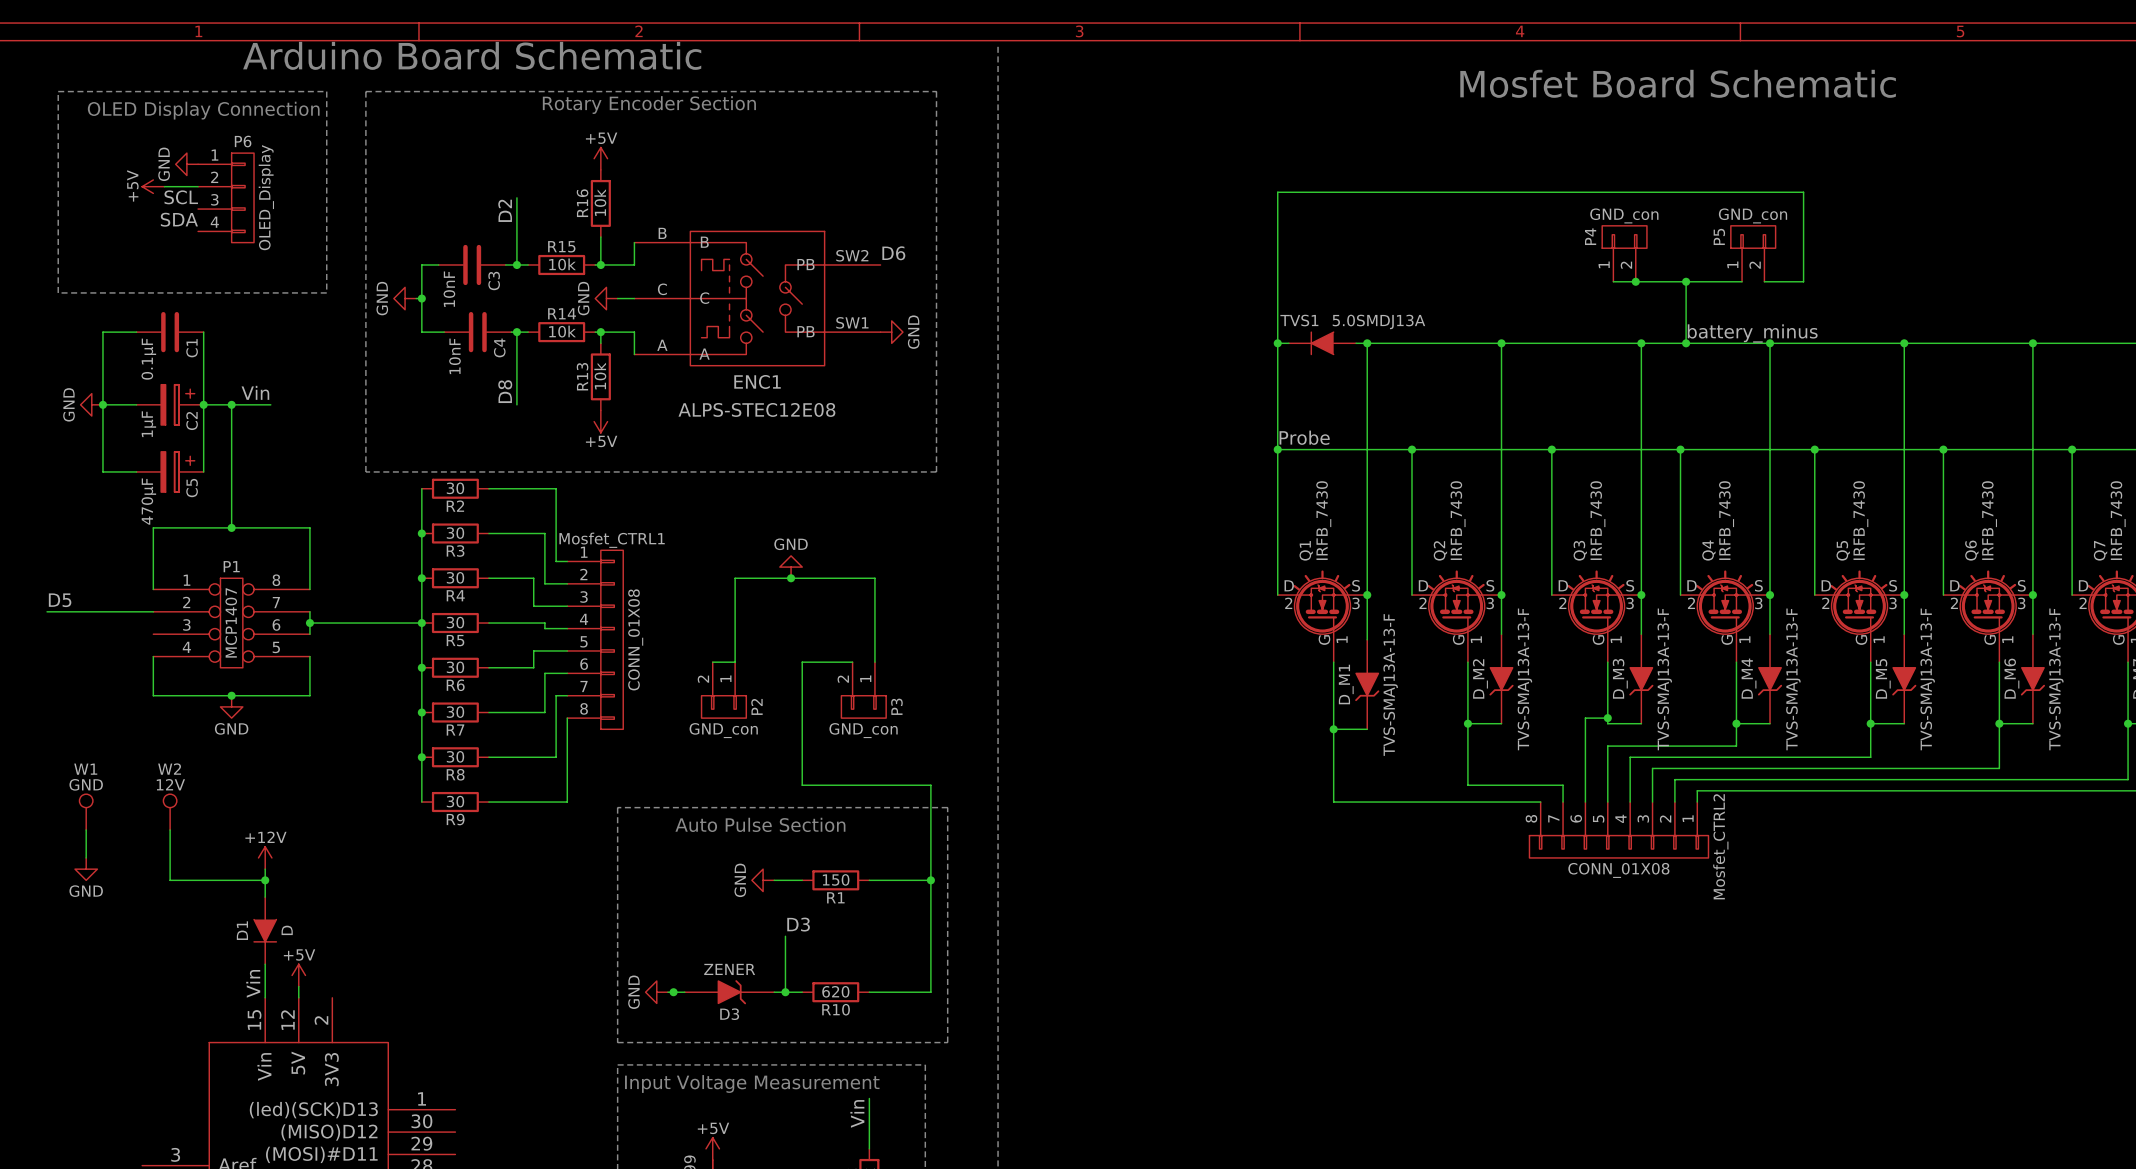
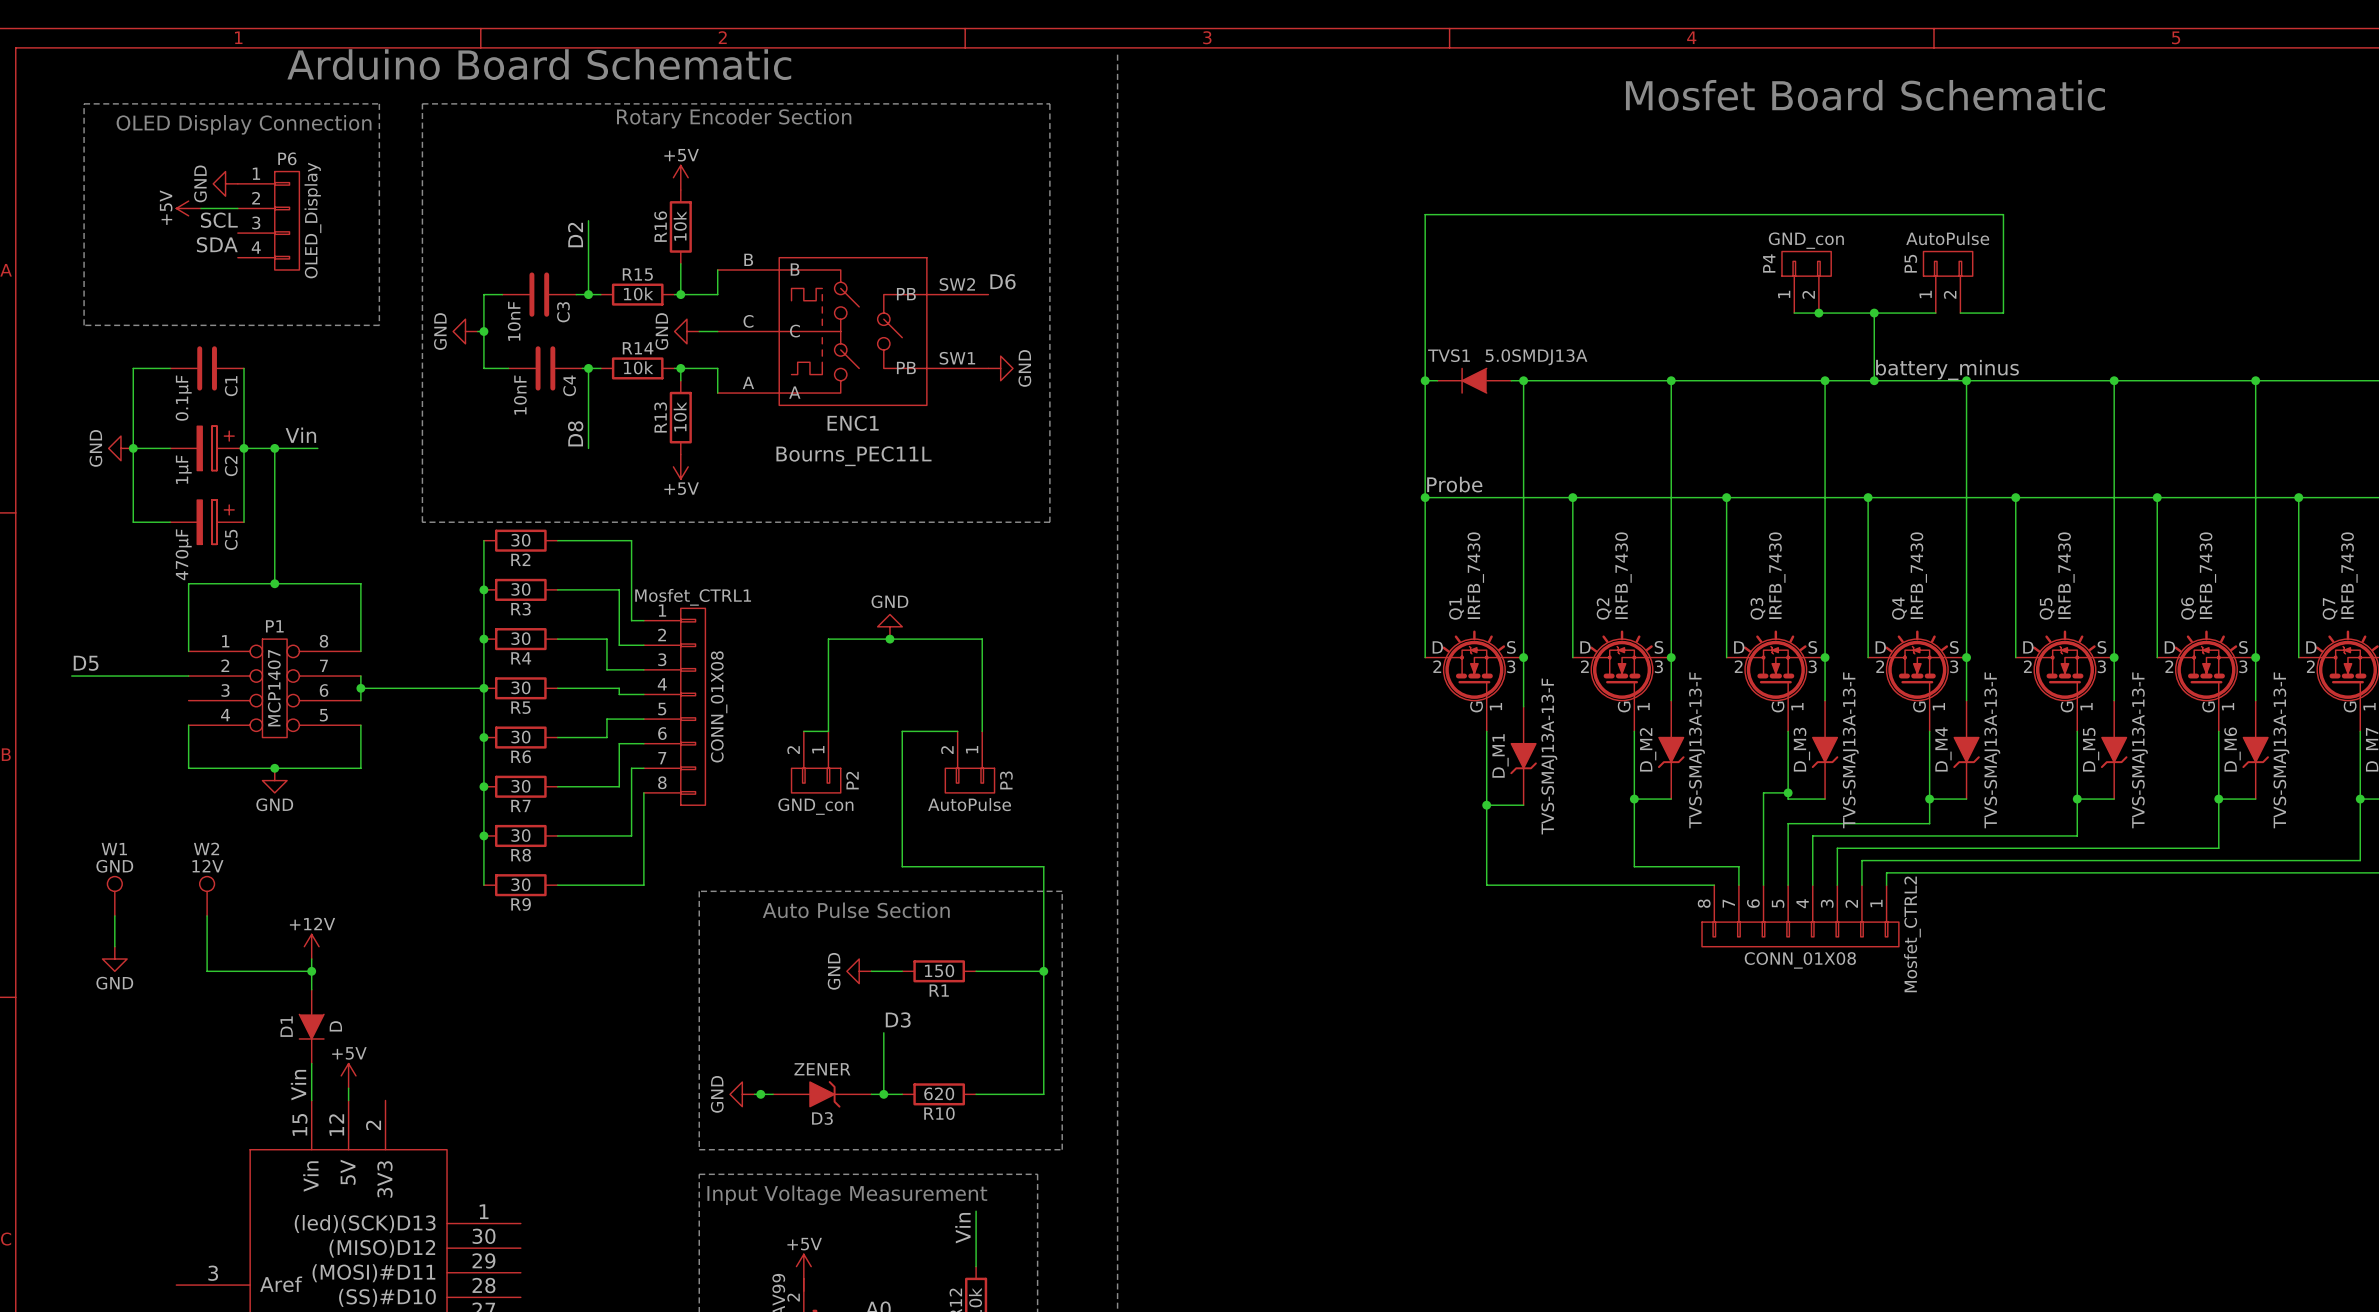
P5 value: GND_con (1753, 215) -> AutoPulse (1947, 238)
ENC1 value: ALPS-STEC12E08 (756, 409) -> Bourns_PEC11L (853, 456)
P3 value: GND_con (863, 730) -> AutoPulse (969, 804)

